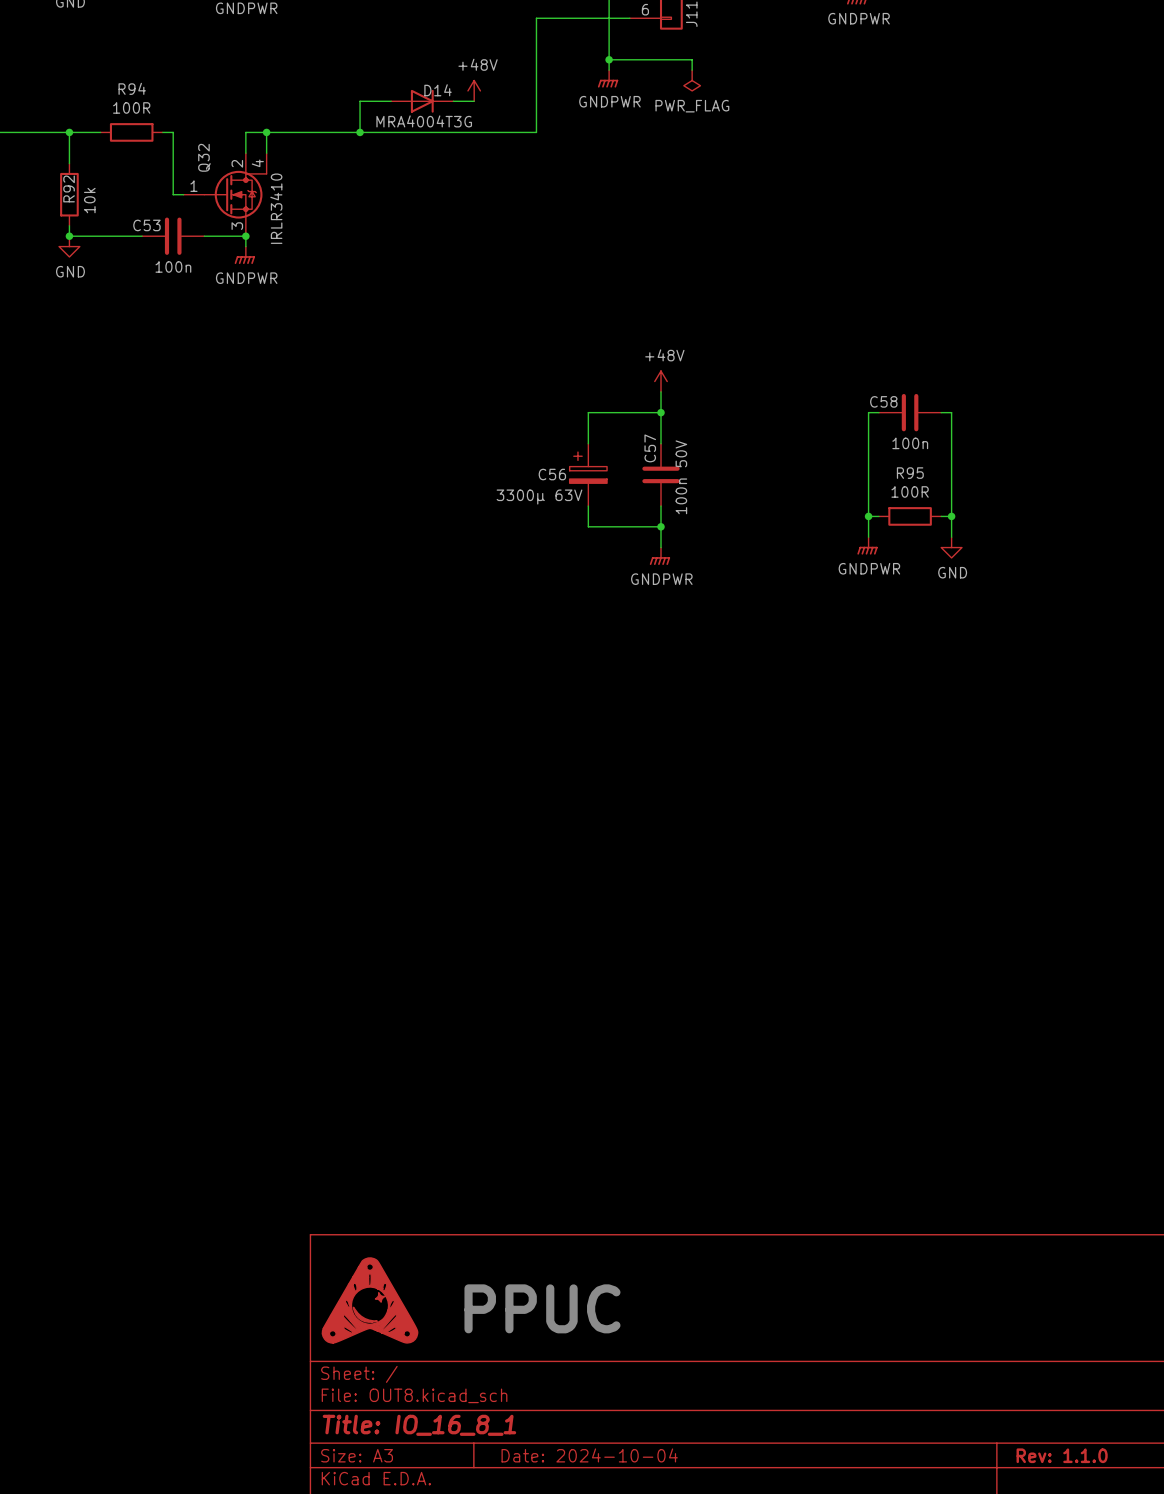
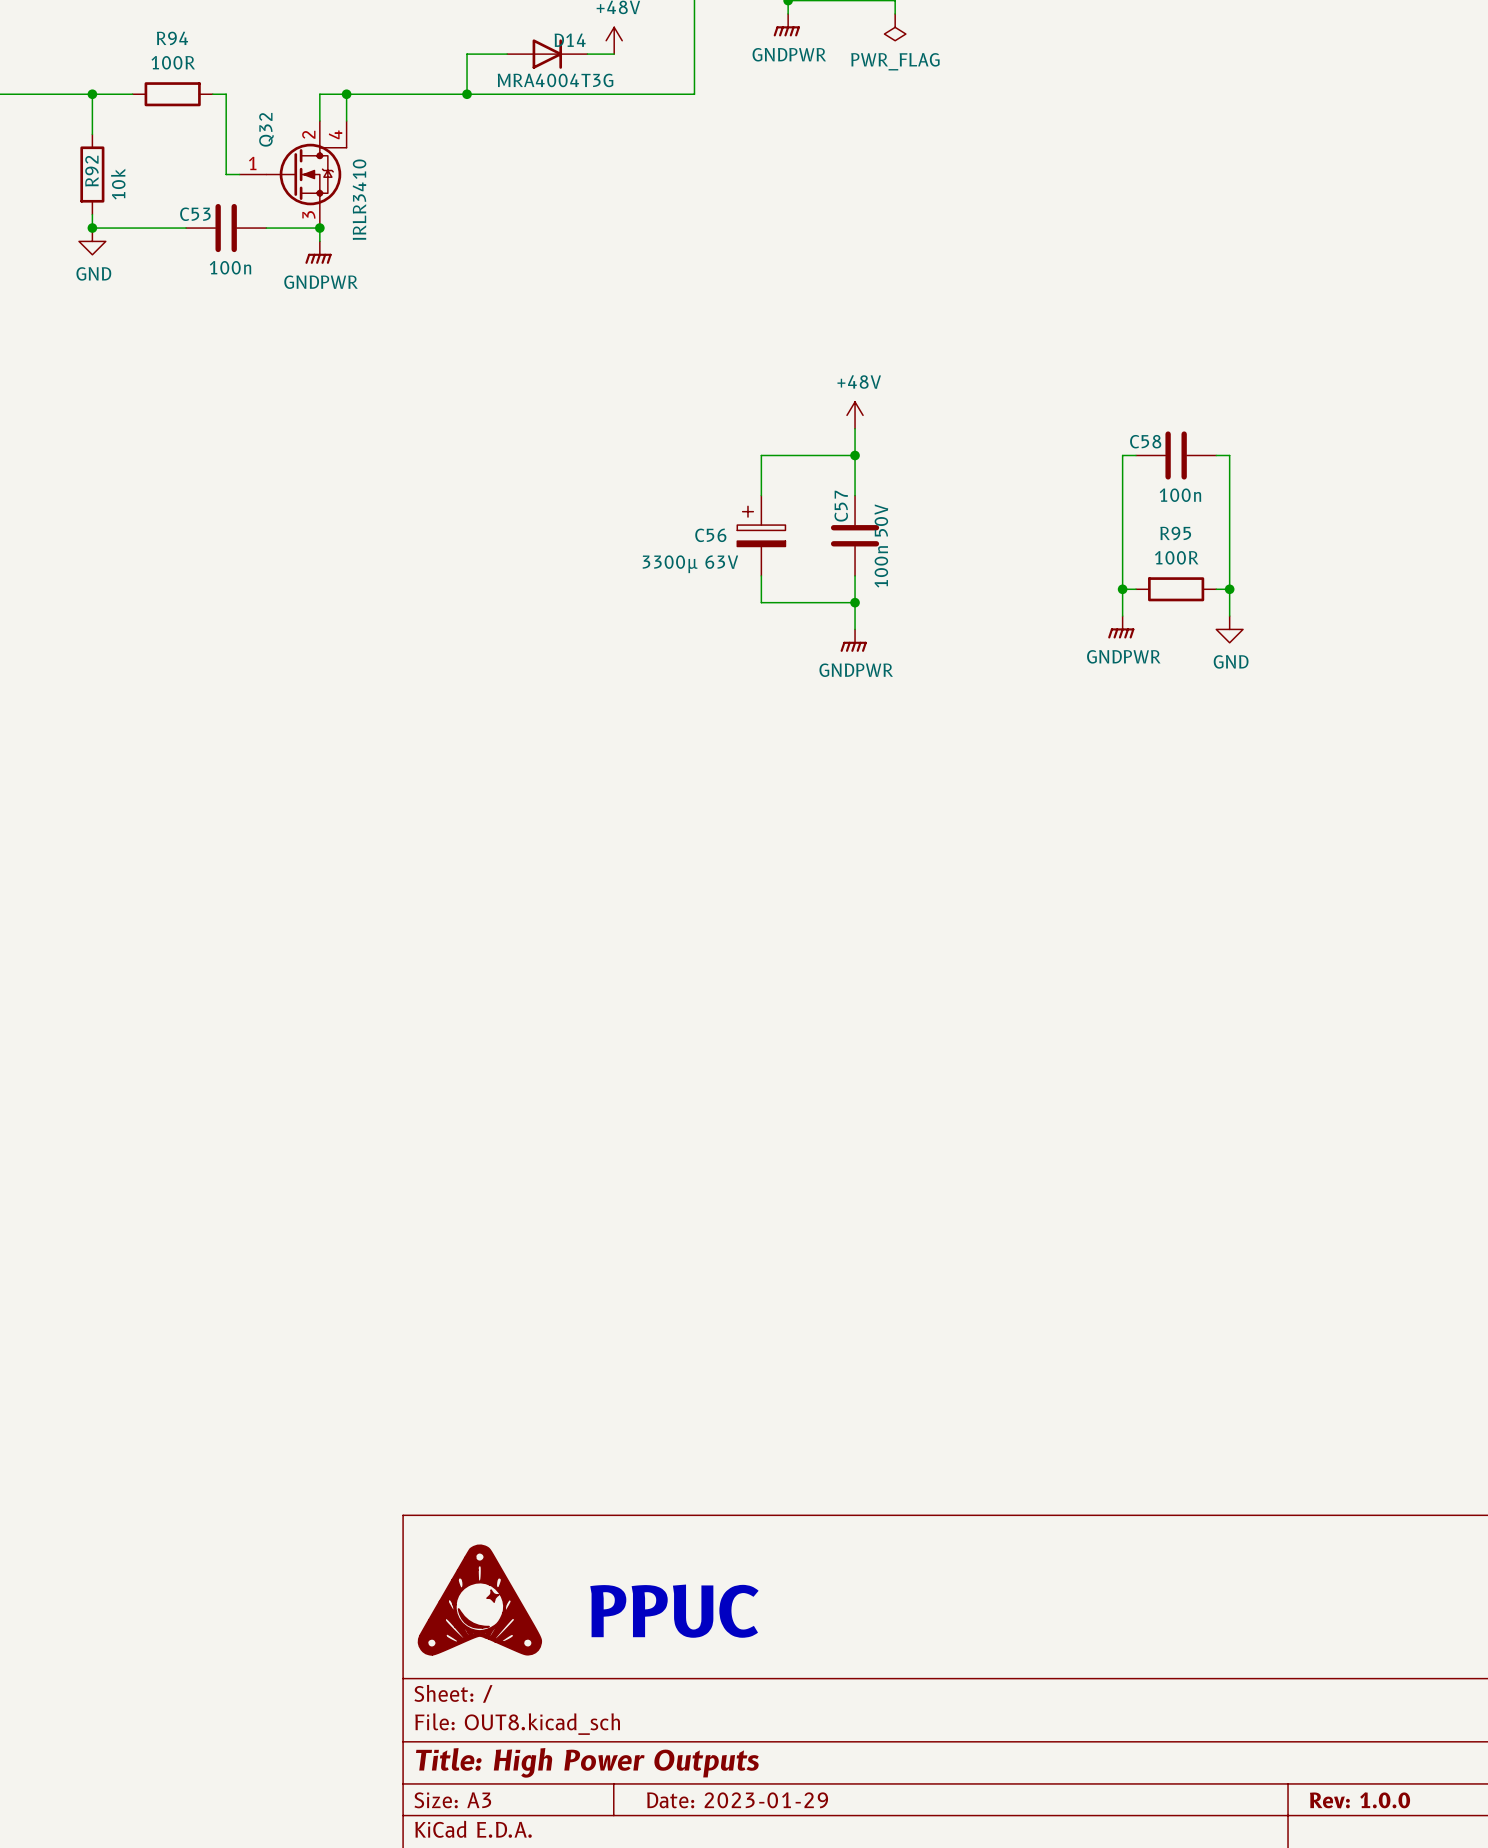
title block: Title: IO_16_8_1 (419, 1425) -> Title: High Power Outputs (587, 1762)
title block: Date: 2024-10-04 (589, 1455) -> Date: 2023-01-29 (737, 1800)
title block: Rev: 1.1.0 (1062, 1455) -> Rev: 1.0.0 (1360, 1800)

